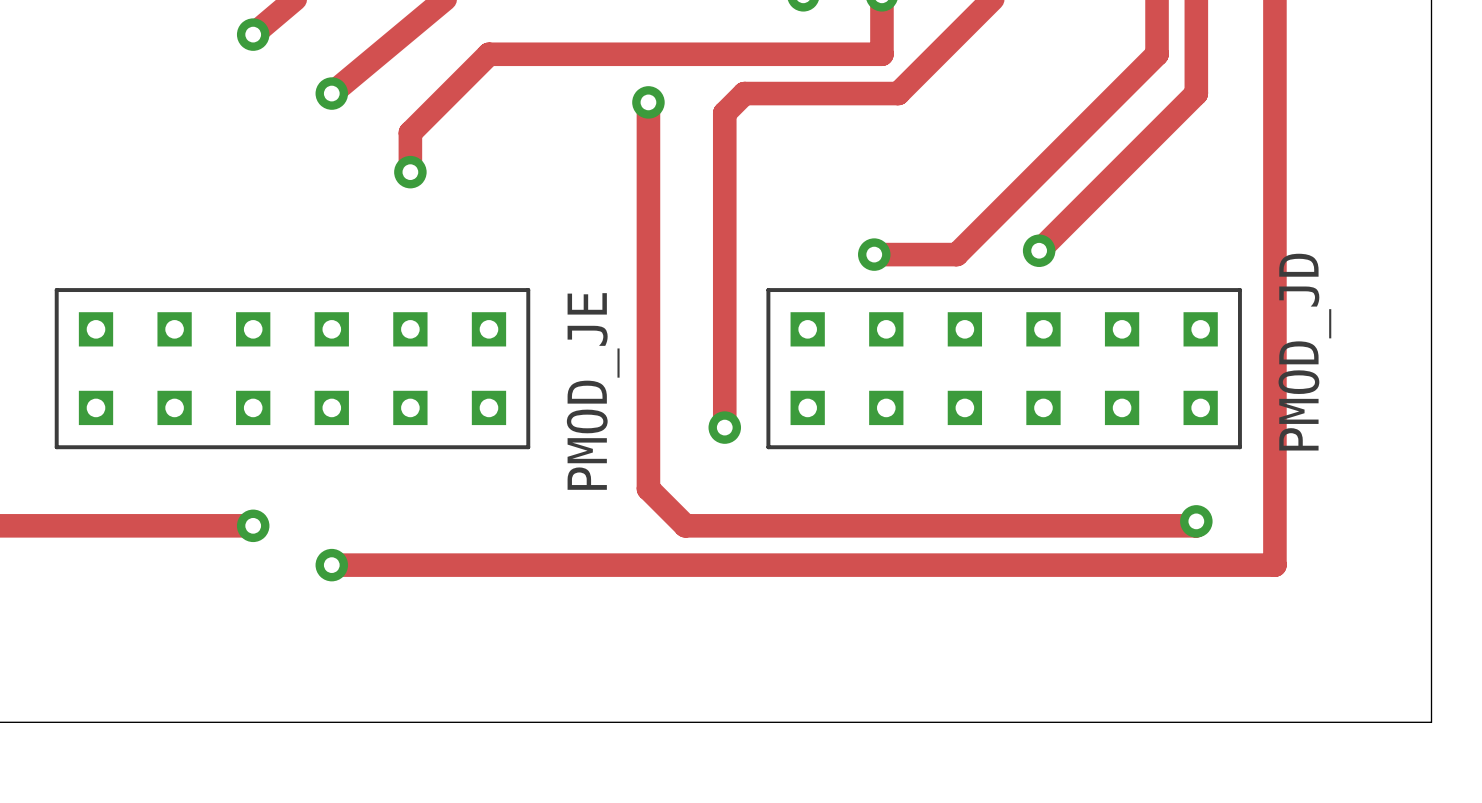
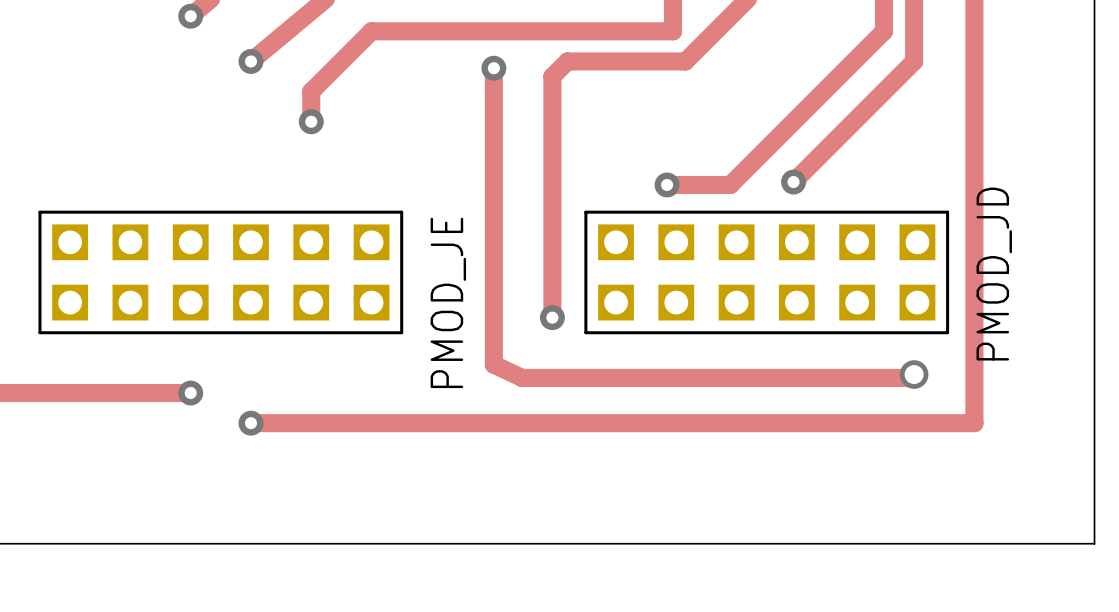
part footprint: [54, 288, 531, 450] -> [38, 210, 404, 335]
part footprint: [766, 288, 1242, 450] -> [584, 210, 950, 335]
track: (648, 488) (685, 525) (1196, 525) (1196, 521) -> (493, 364) (522, 377) (914, 377) (914, 374)
via position: (1196, 521) -> (914, 374)

